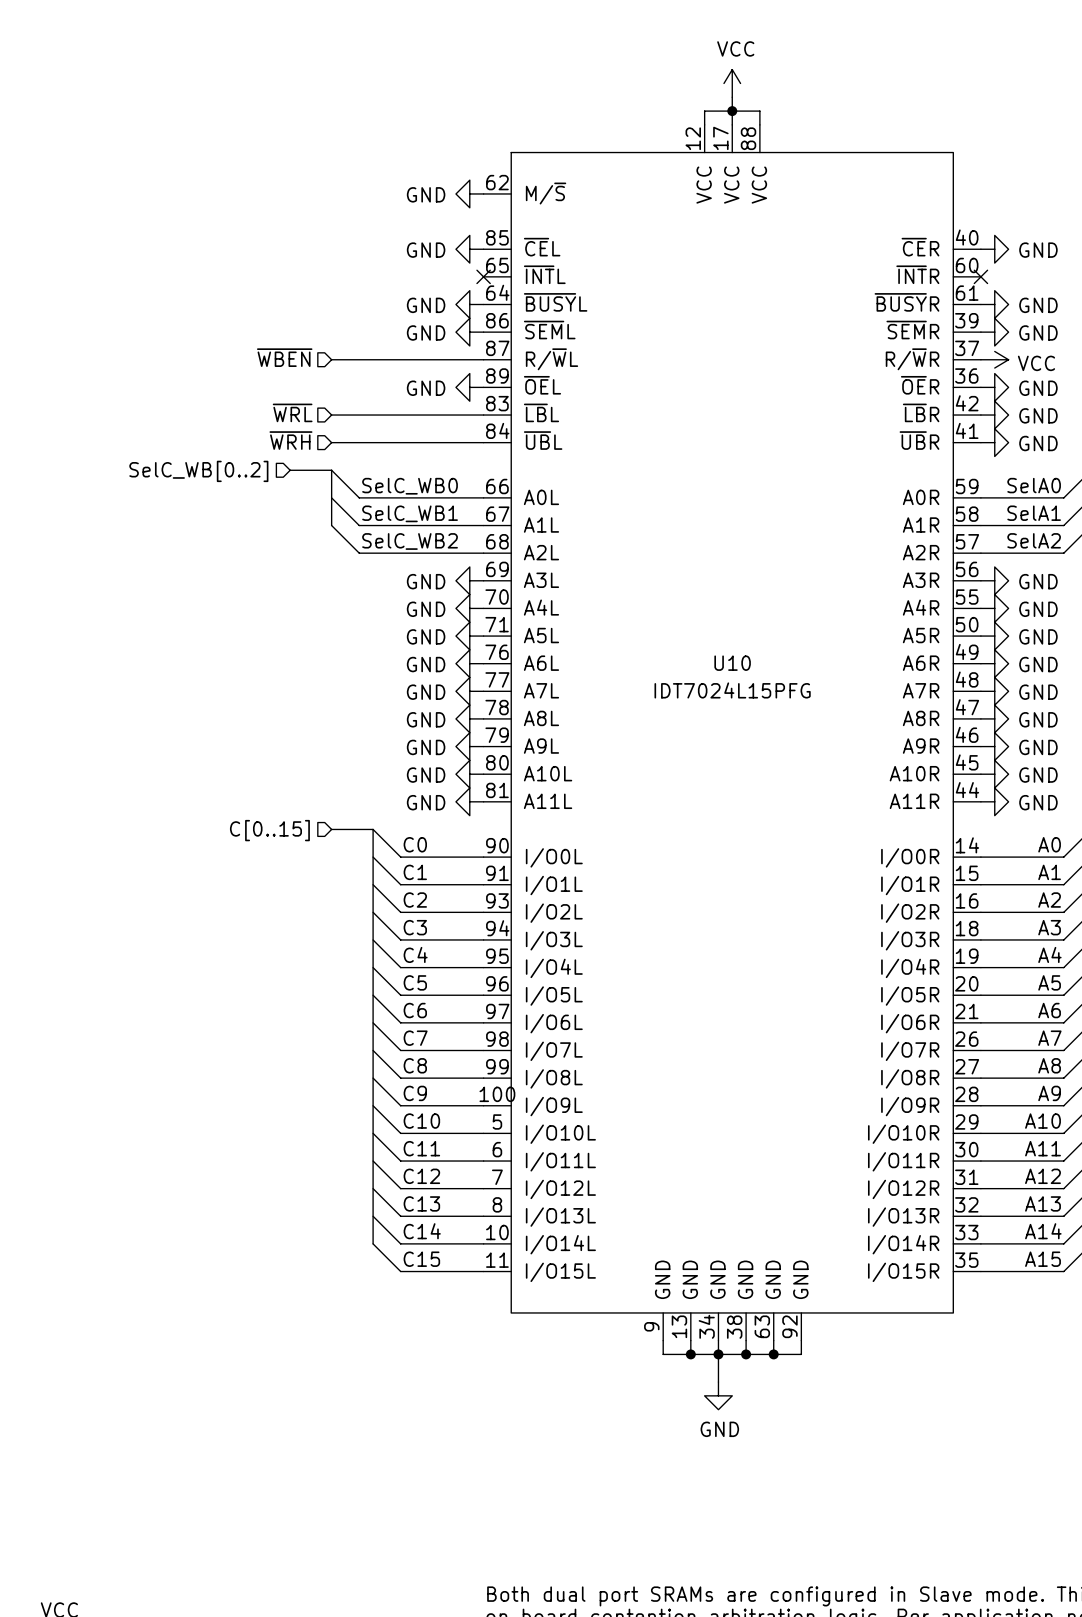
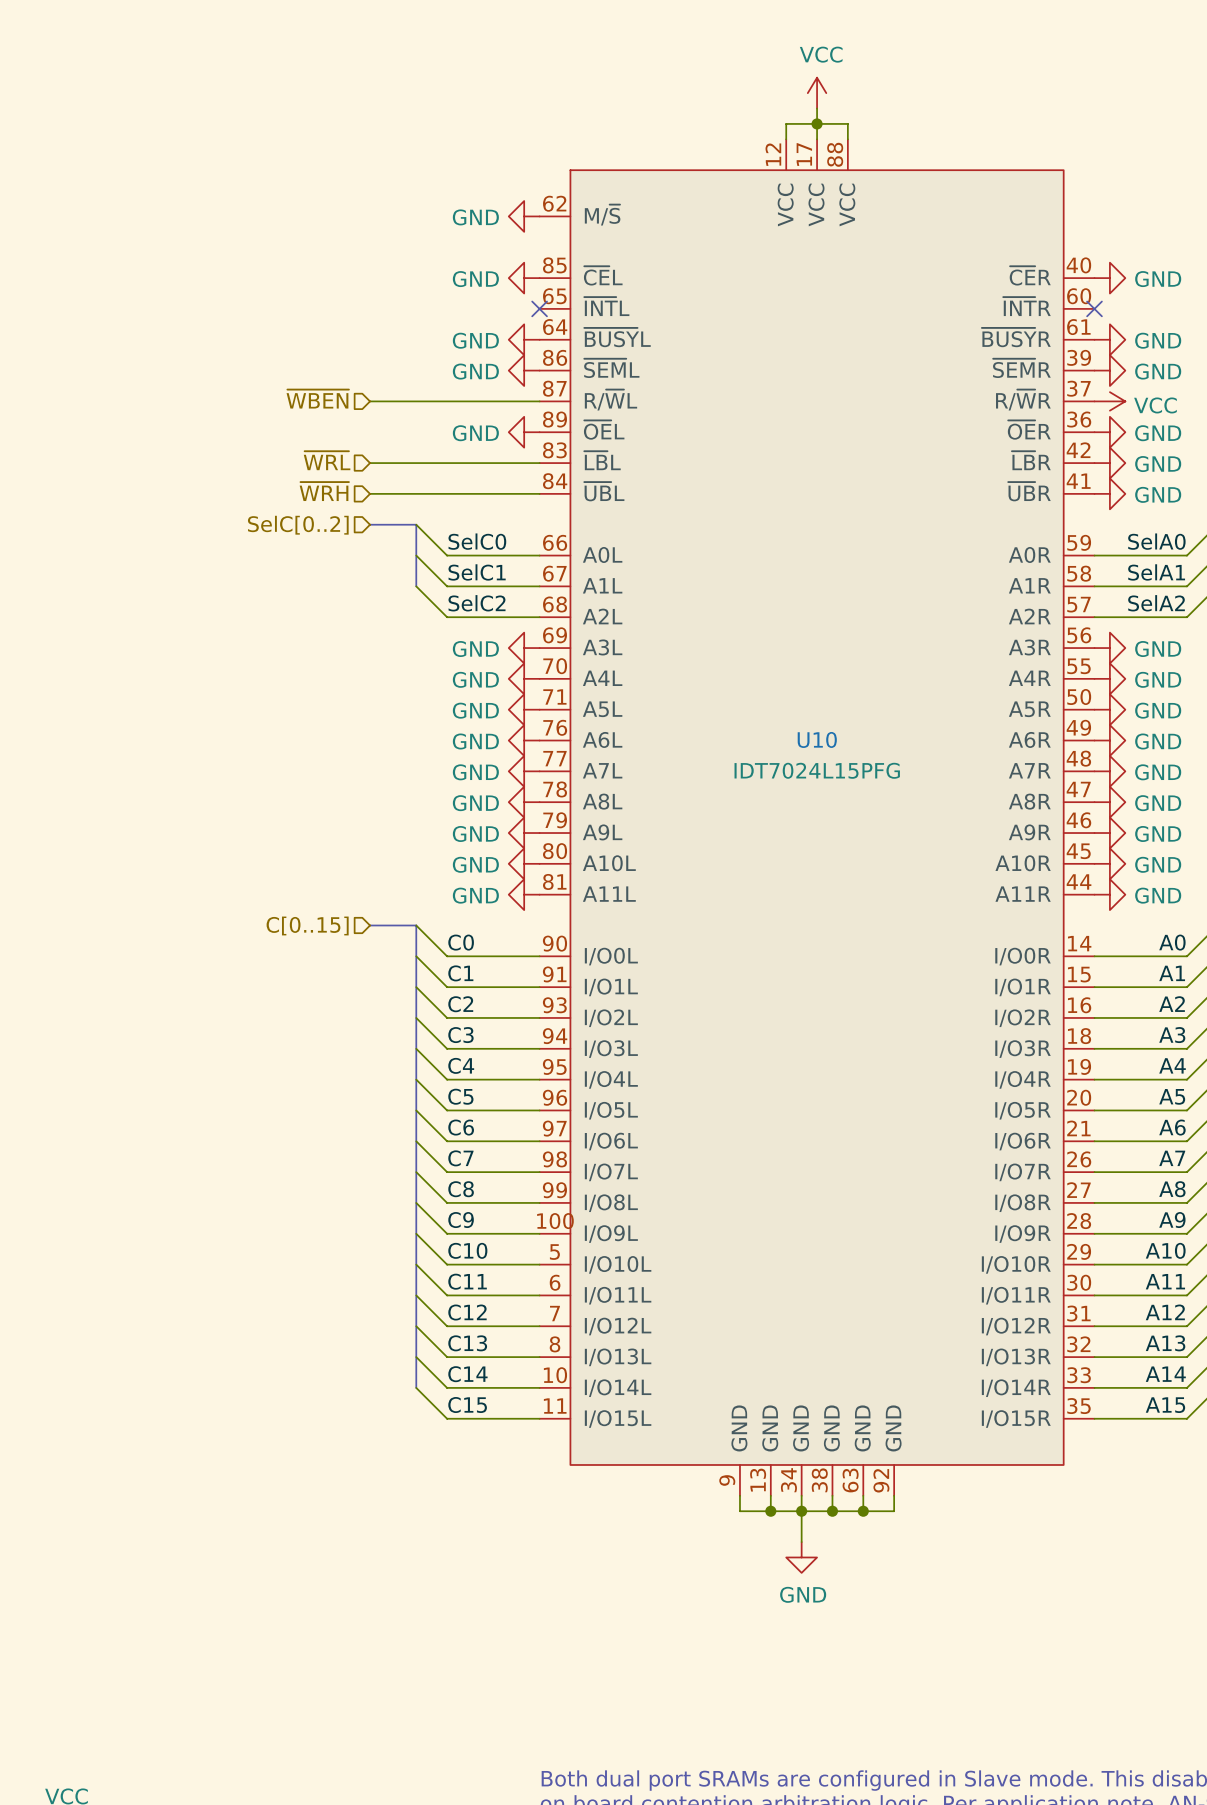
bus: (290, 470) (331, 470) (331, 525) -> (370, 524) (416, 524) (416, 586)
wire: (331, 470) (359, 497) (400, 497) -> (416, 524) (447, 555)
hierarchical label: SelC_WB[0..2] (198, 471) -> SelC[0..2] (298, 525)
label: none -> SelC0 (477, 541)
label: SelC_WB0 (410, 486) -> none
wire: (331, 497) (359, 525) (400, 525) -> (416, 555) (447, 586)
label: SelC_WB1 (410, 513) -> none
label: none -> SelC1 (477, 572)
wire: (331, 525) (359, 553) (400, 553) -> (416, 586) (447, 617)
label: none -> SelC2 (477, 603)
label: SelC_WB2 (410, 541) -> none

